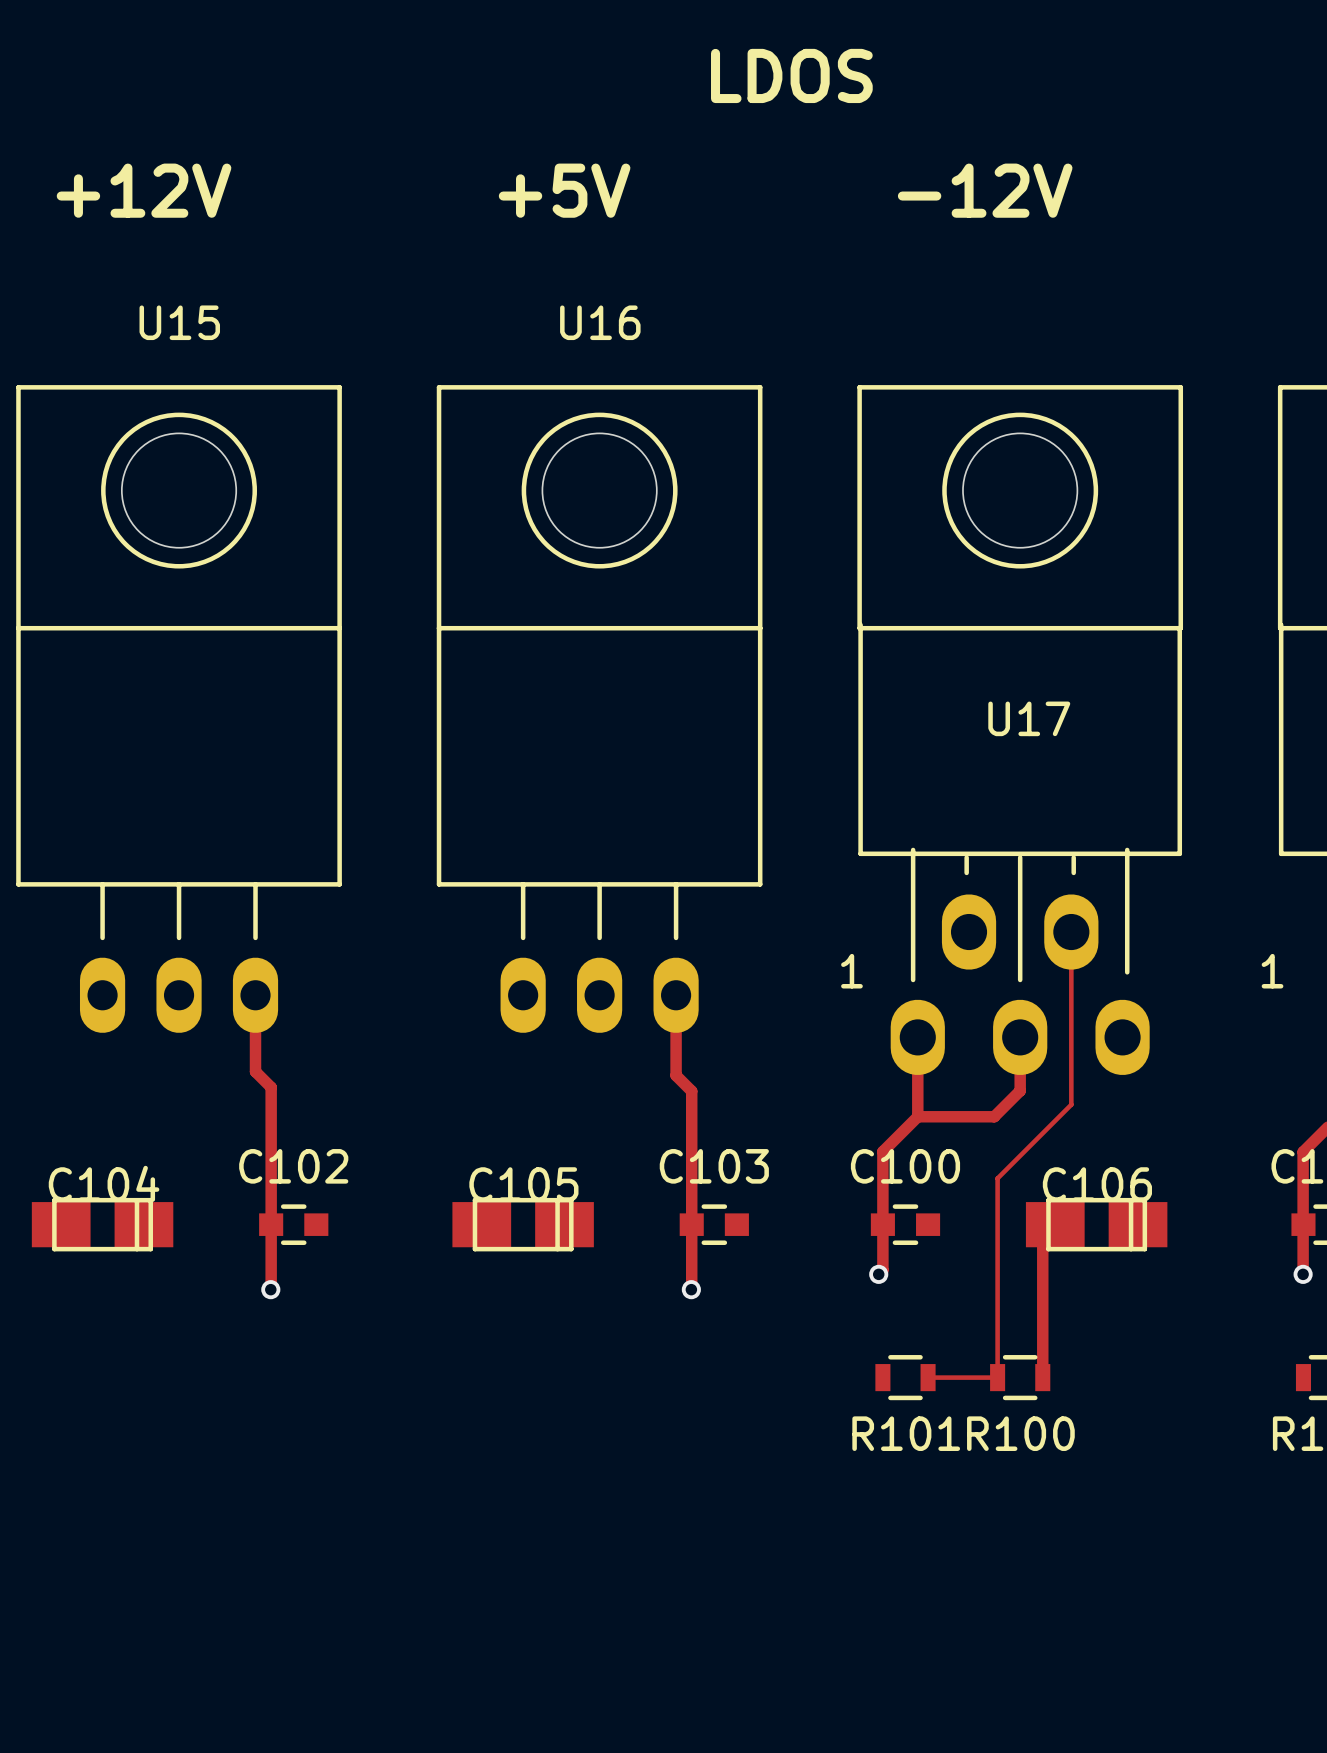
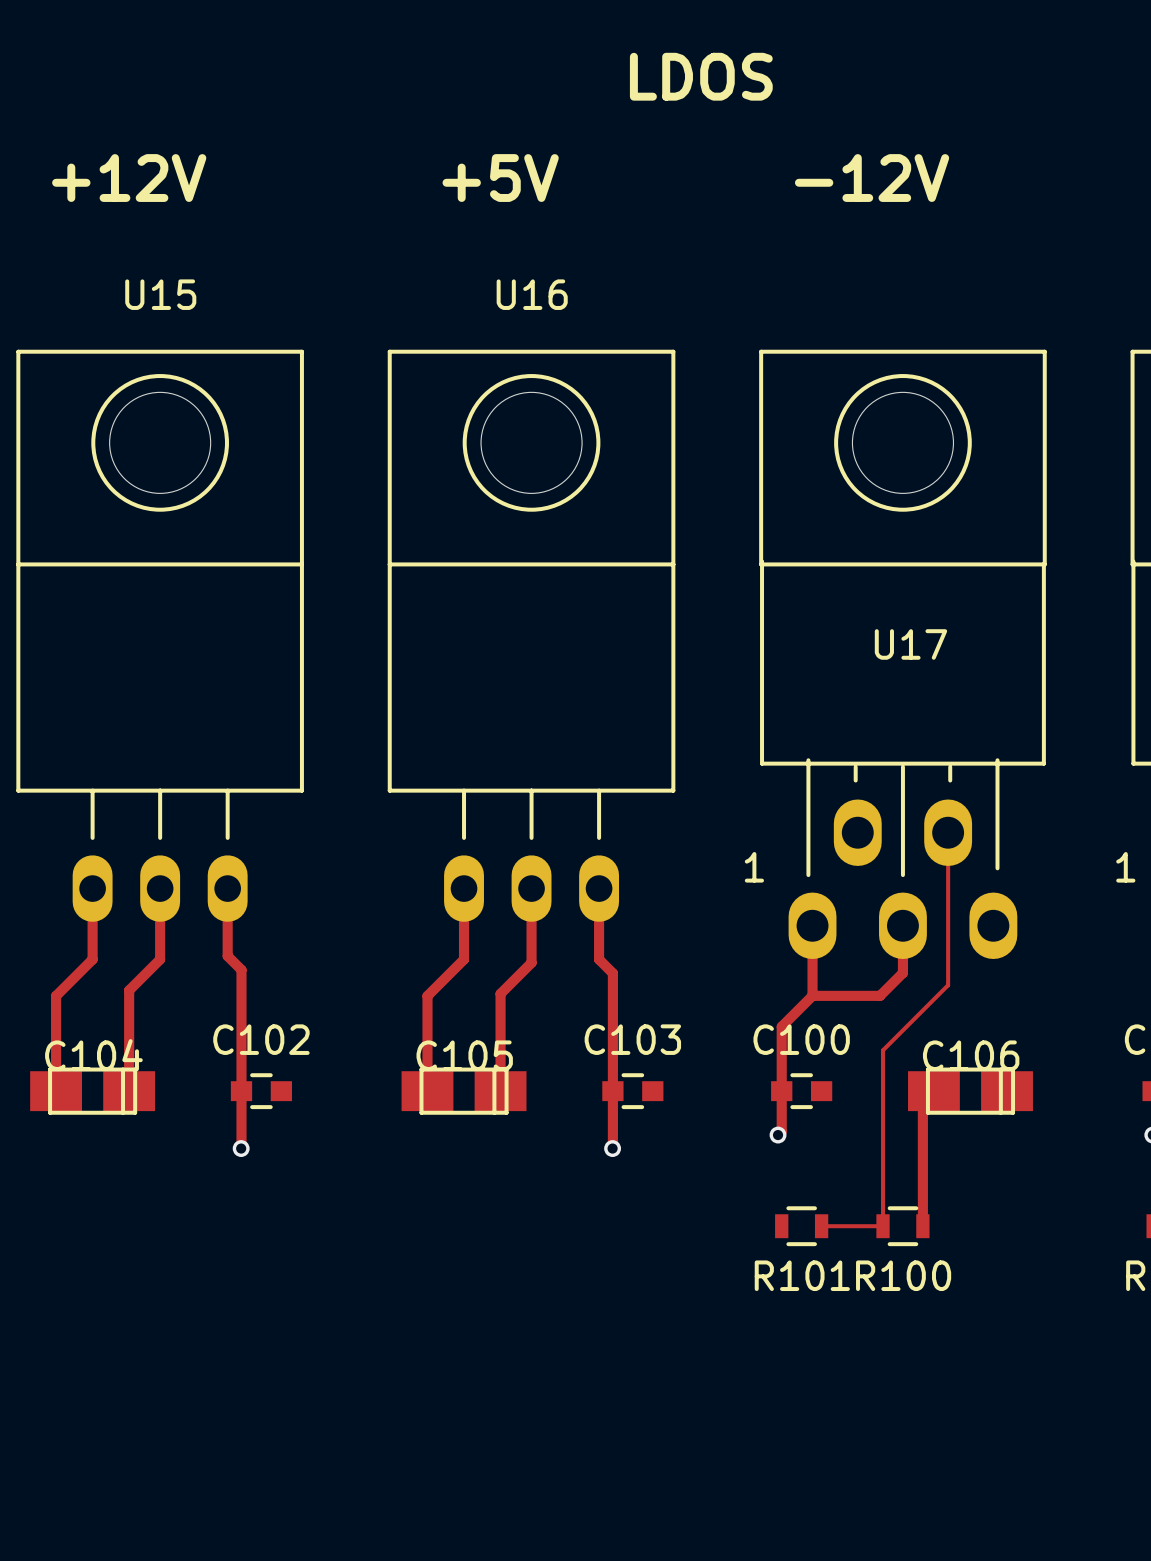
track: none -> (92, 888) (92, 959) (56, 996) (56, 1091)
track: none -> (160, 888) (160, 959) (129, 990) (129, 1091)
track: none -> (464, 888) (464, 959) (427, 996) (427, 1091)
track: none -> (531, 888) (531, 962) (500, 993) (500, 1091)

